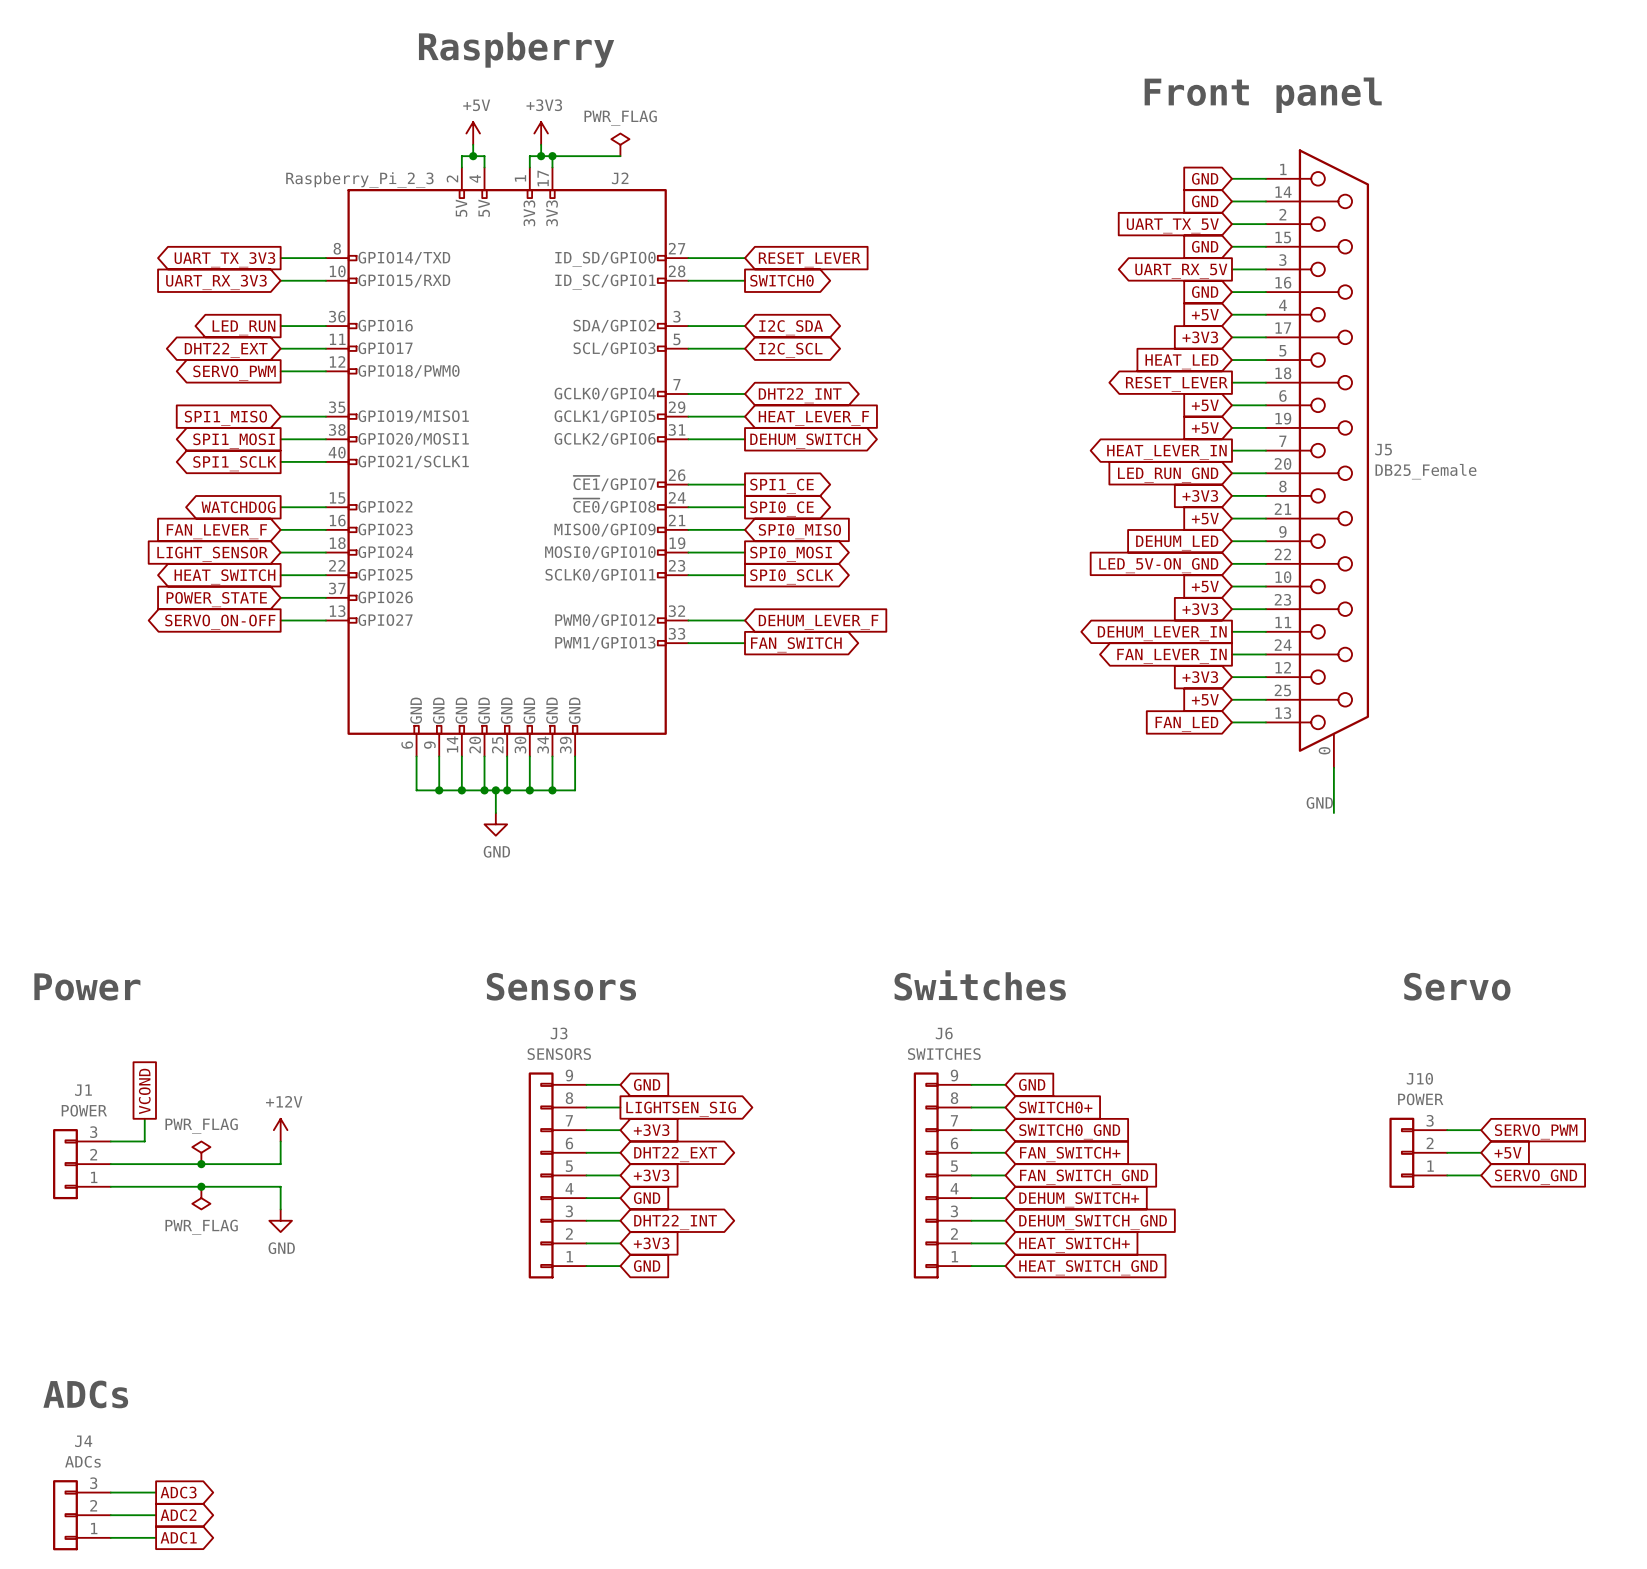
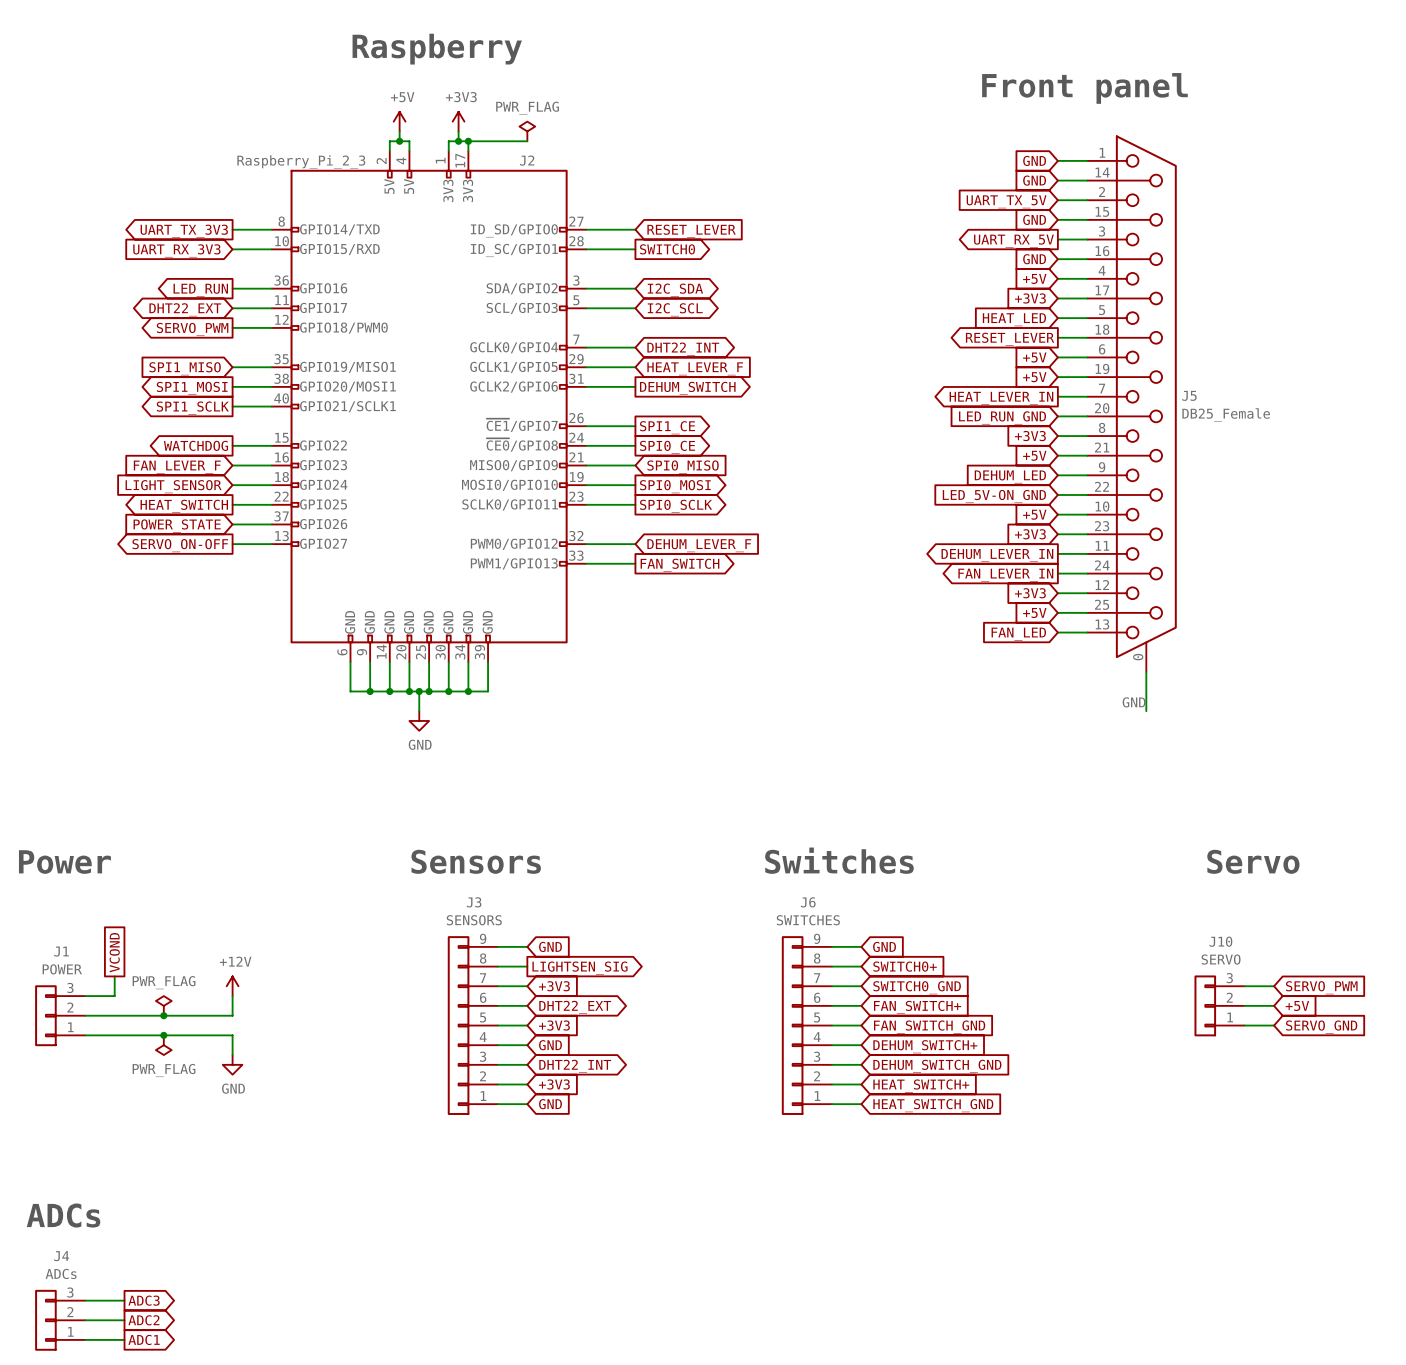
J10 value: POWER (1420, 1099) -> SERVO (1221, 959)

